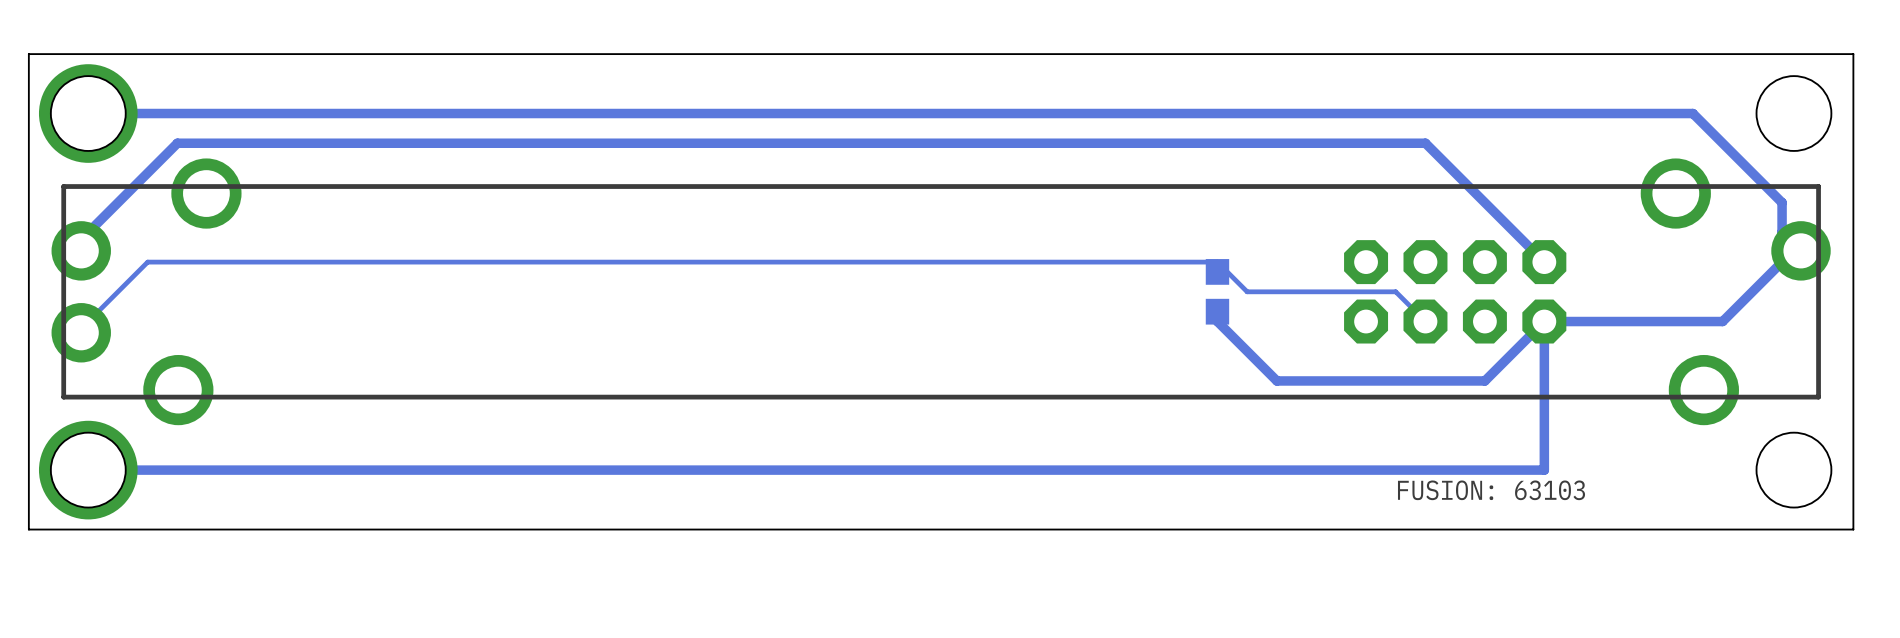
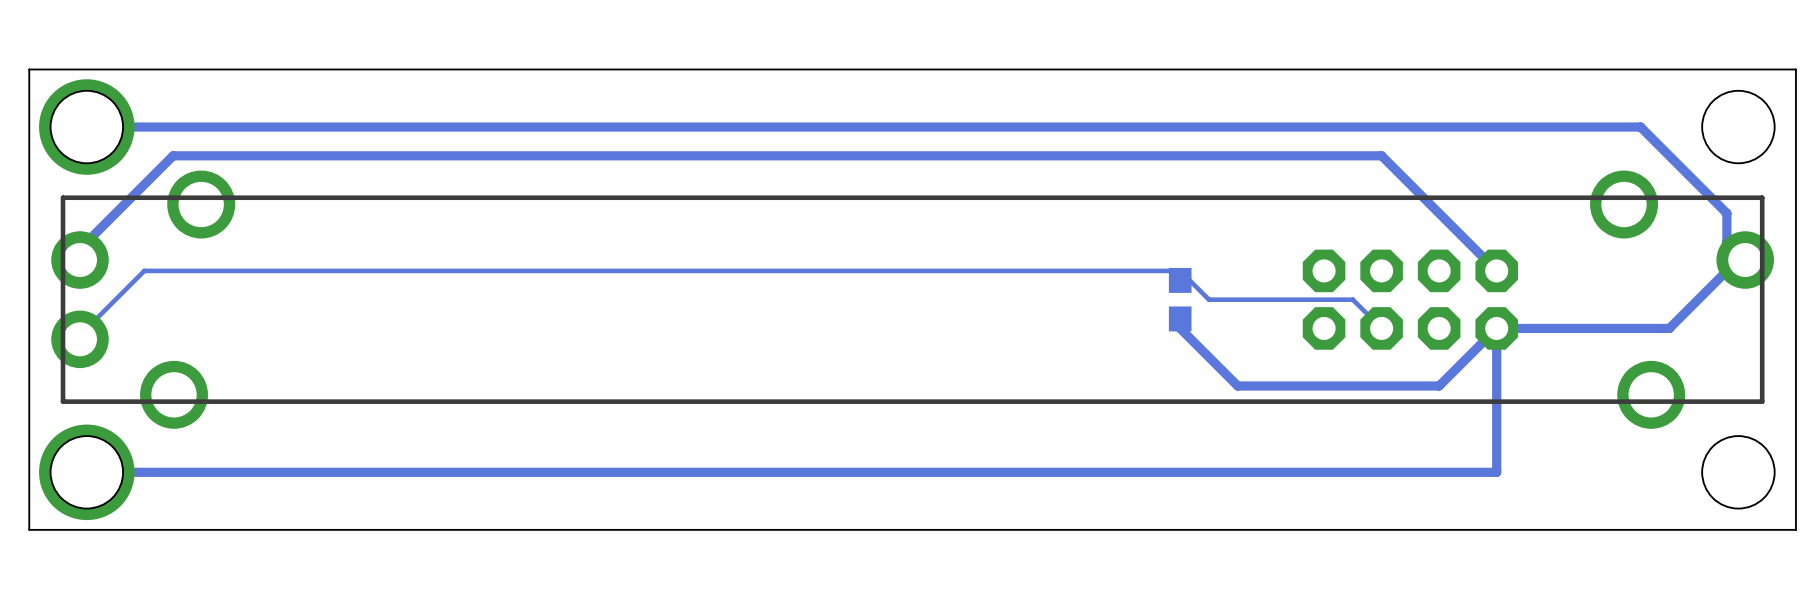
text: FUSION: 63103 (1491, 490) -> none

